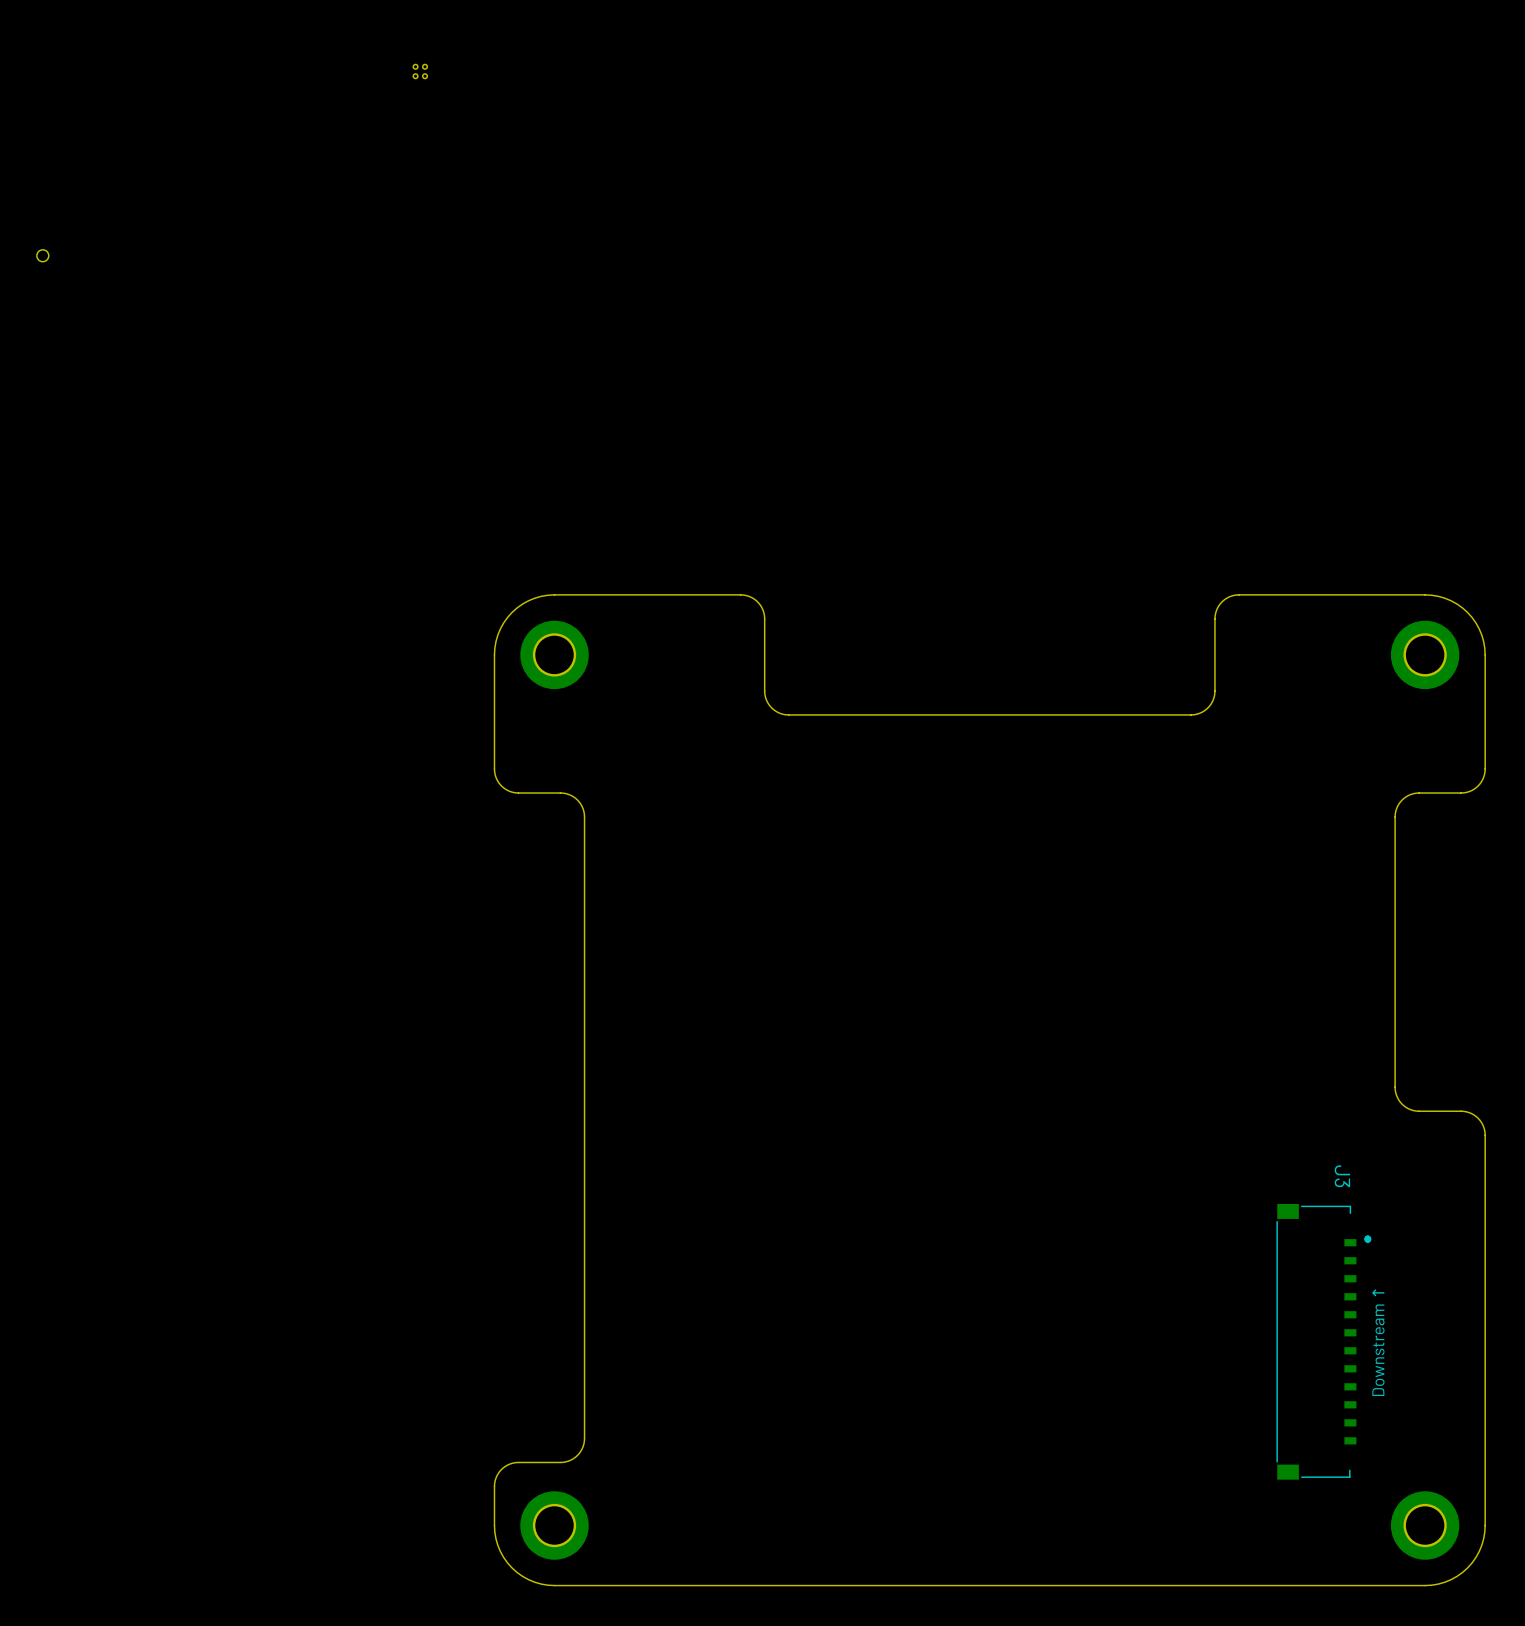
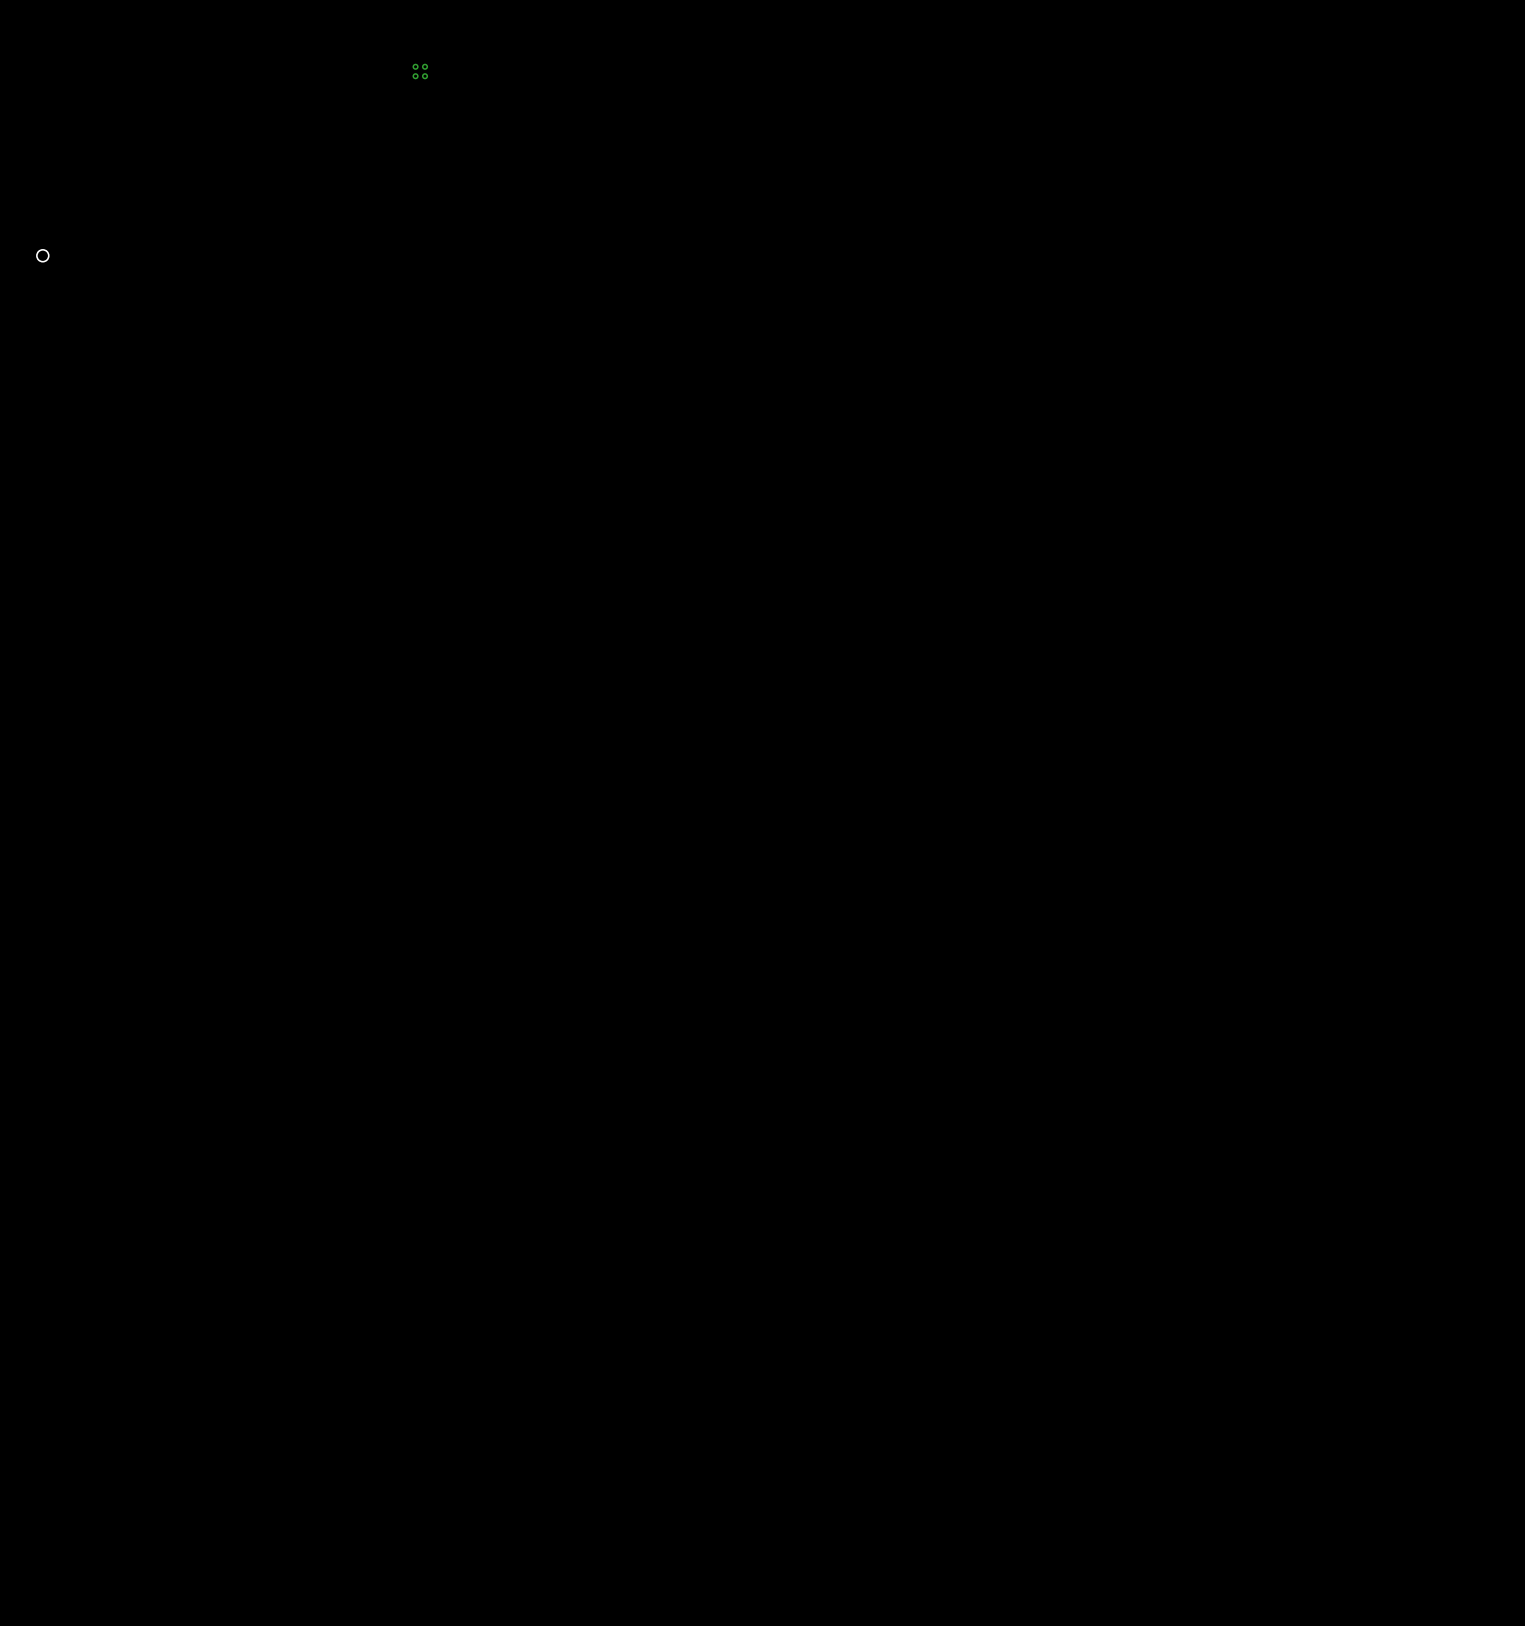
part: (989, 1090) -> none
J3: (1323, 1341) -> none

